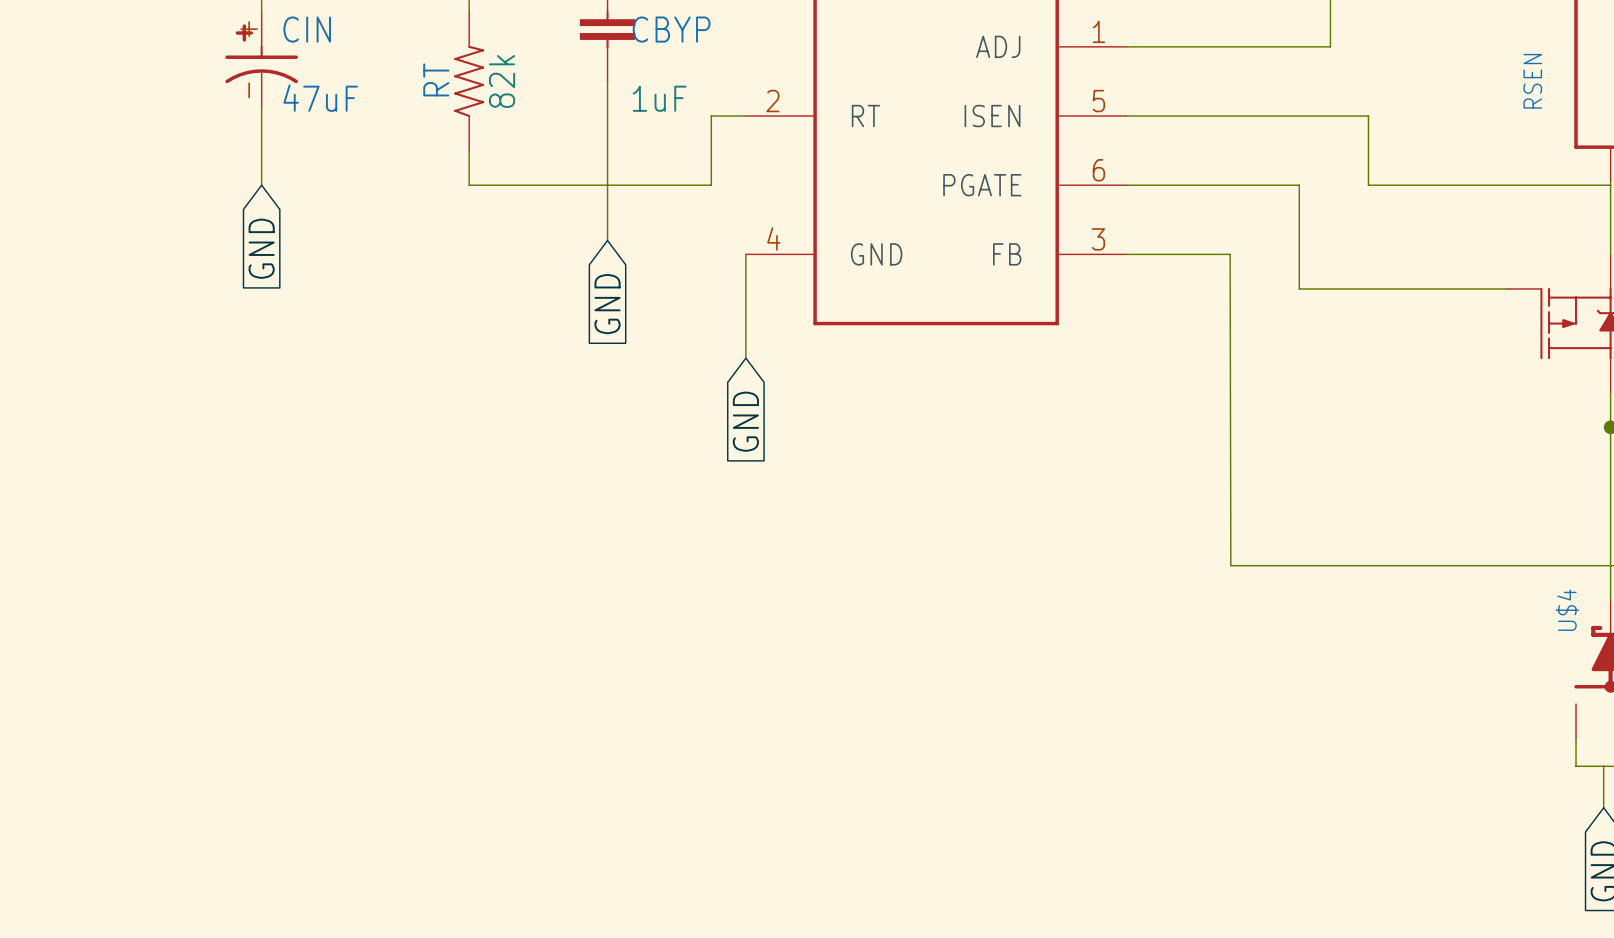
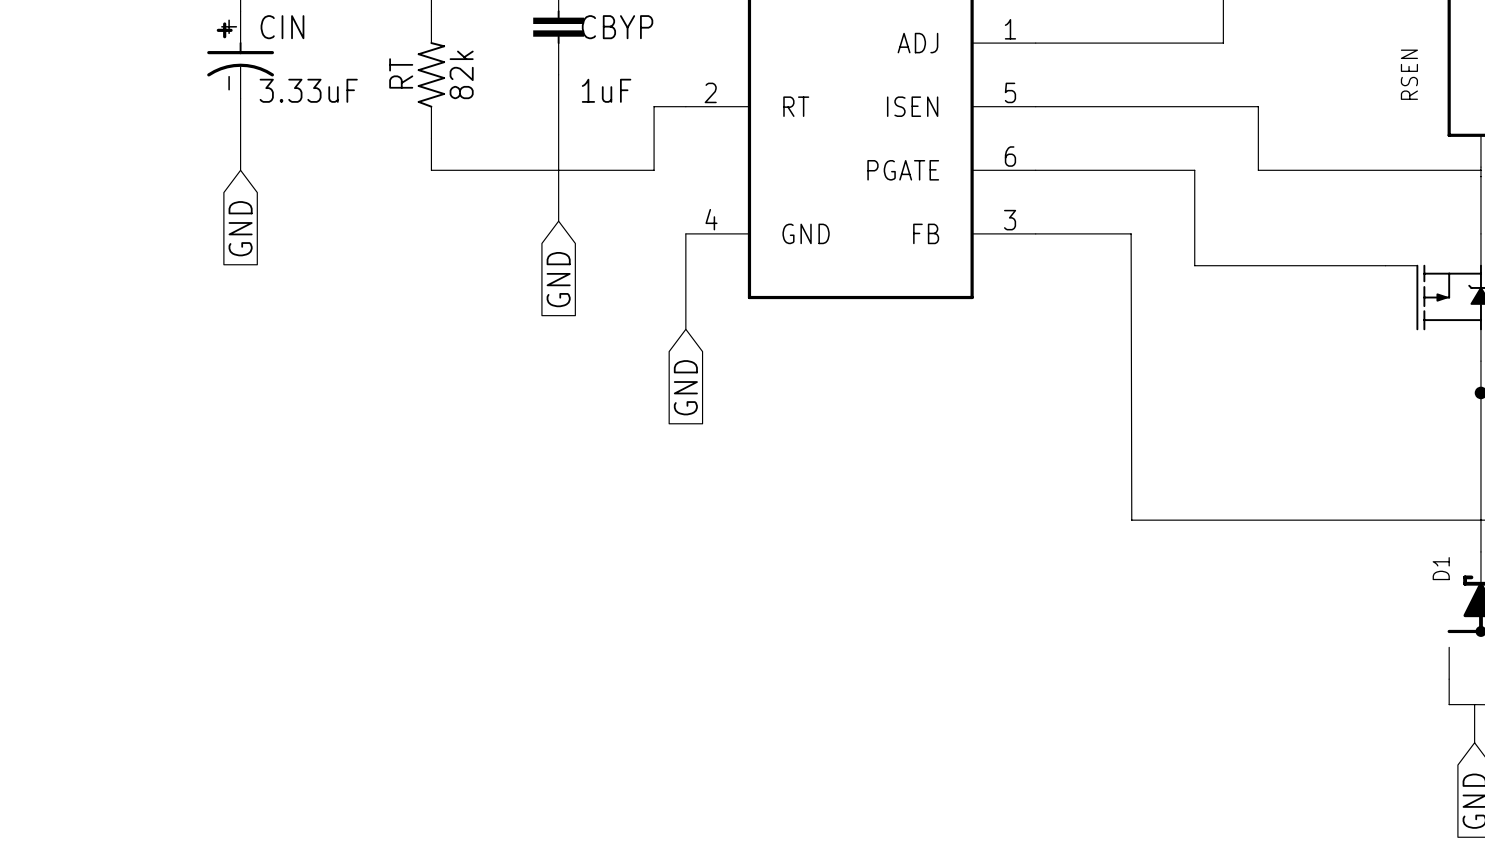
CIN value: 47uF (320, 98) -> 3.33uF (308, 90)
U$4 name: U$4 (1567, 610) -> D1 (1441, 568)

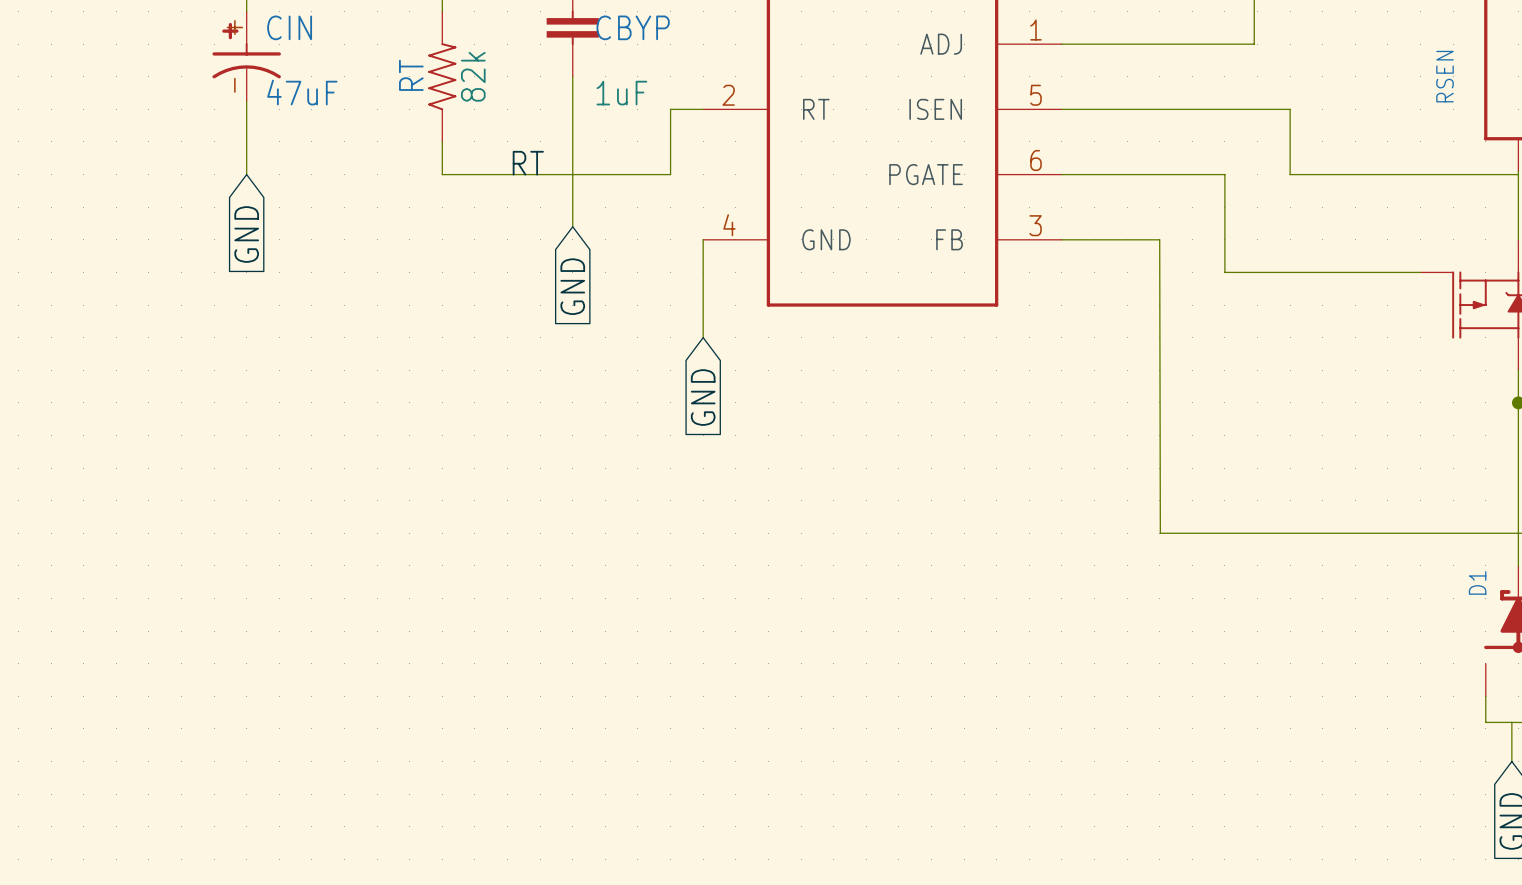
CIN value: 3.33uF (308, 90) -> 47uF (302, 92)
label: none -> RT (528, 163)

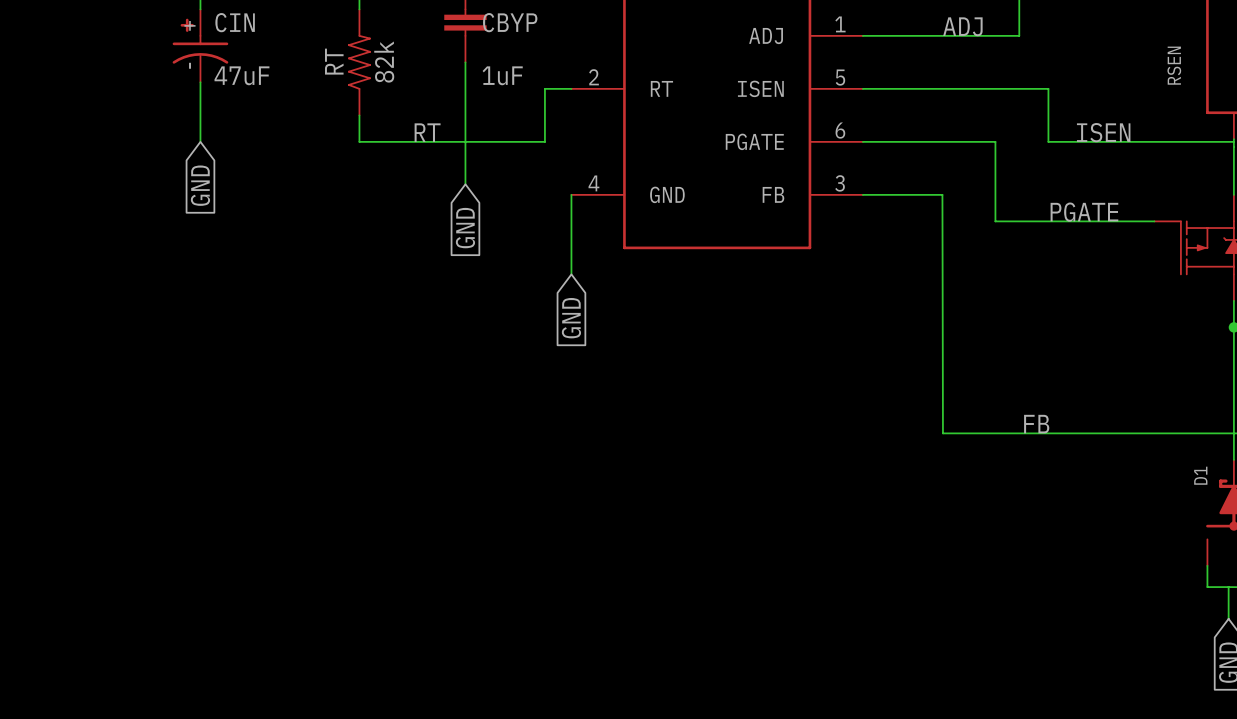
label: none -> ADJ (962, 26)
label: none -> ISEN (1103, 132)
label: none -> PGATE (1084, 212)
label: none -> FB (1036, 424)

